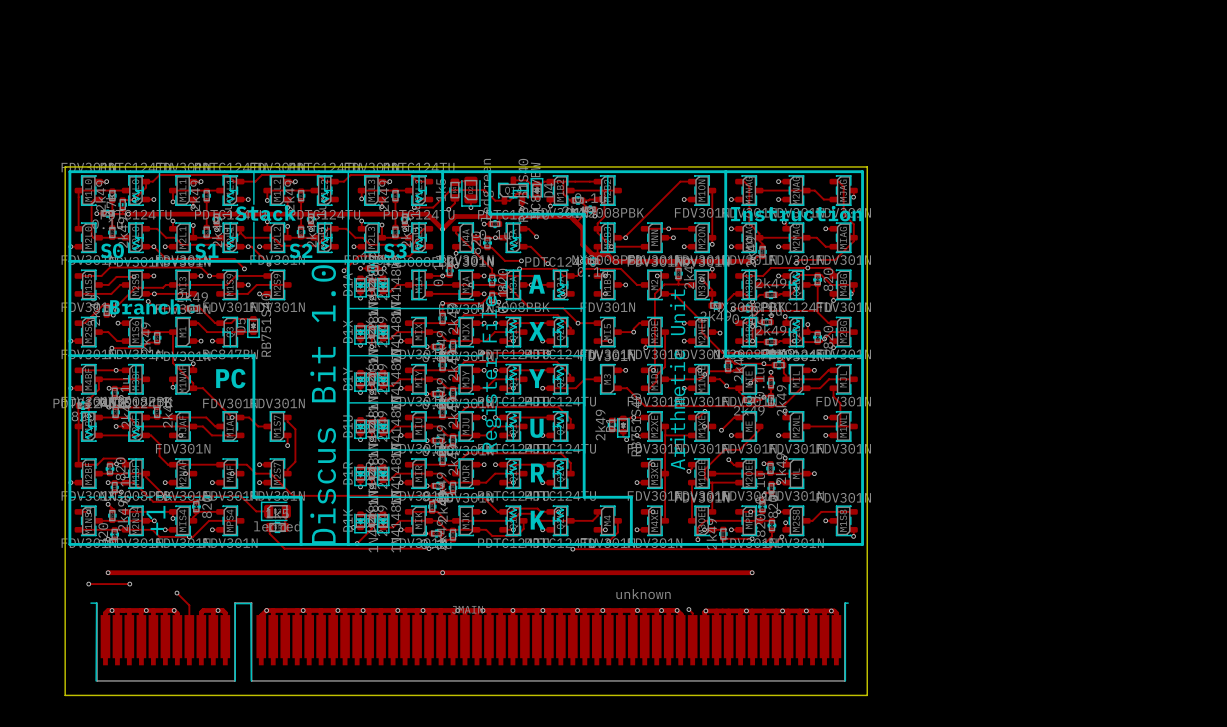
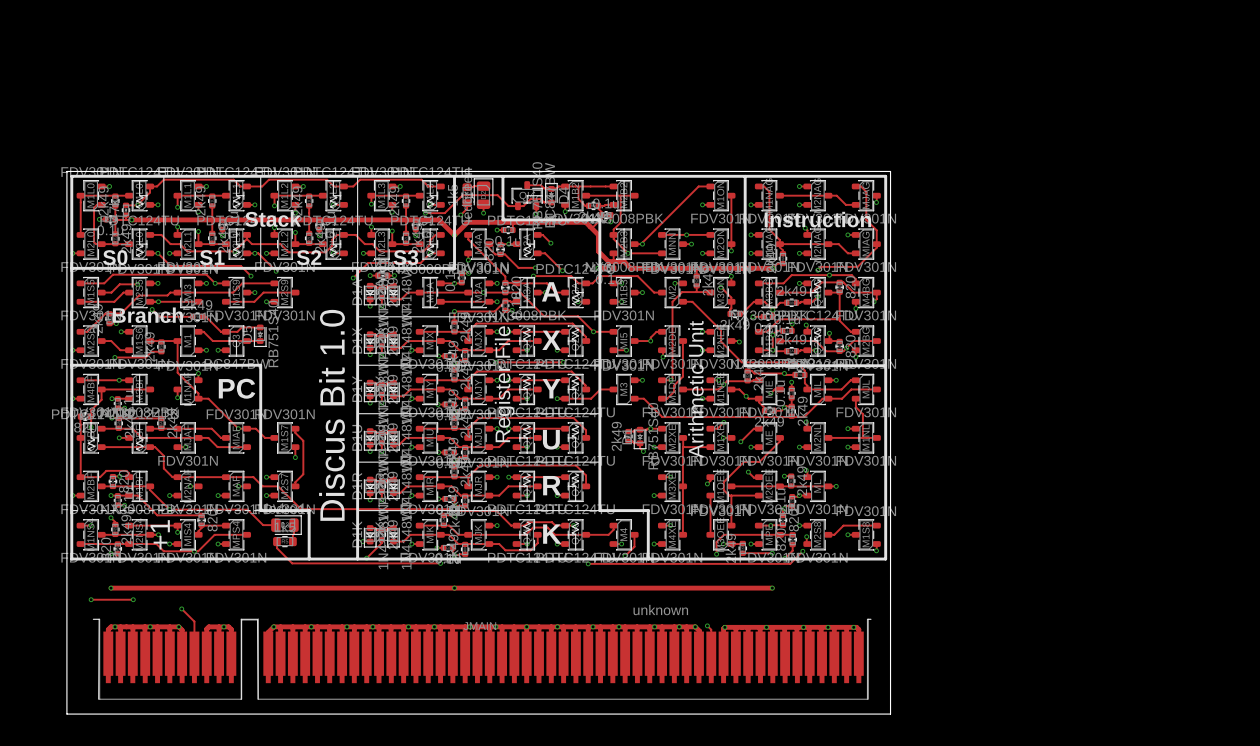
part rotation: 0° (470, 191) -> 180° (483, 193)
part rotation: 0° (275, 511) -> 180° (286, 525)

